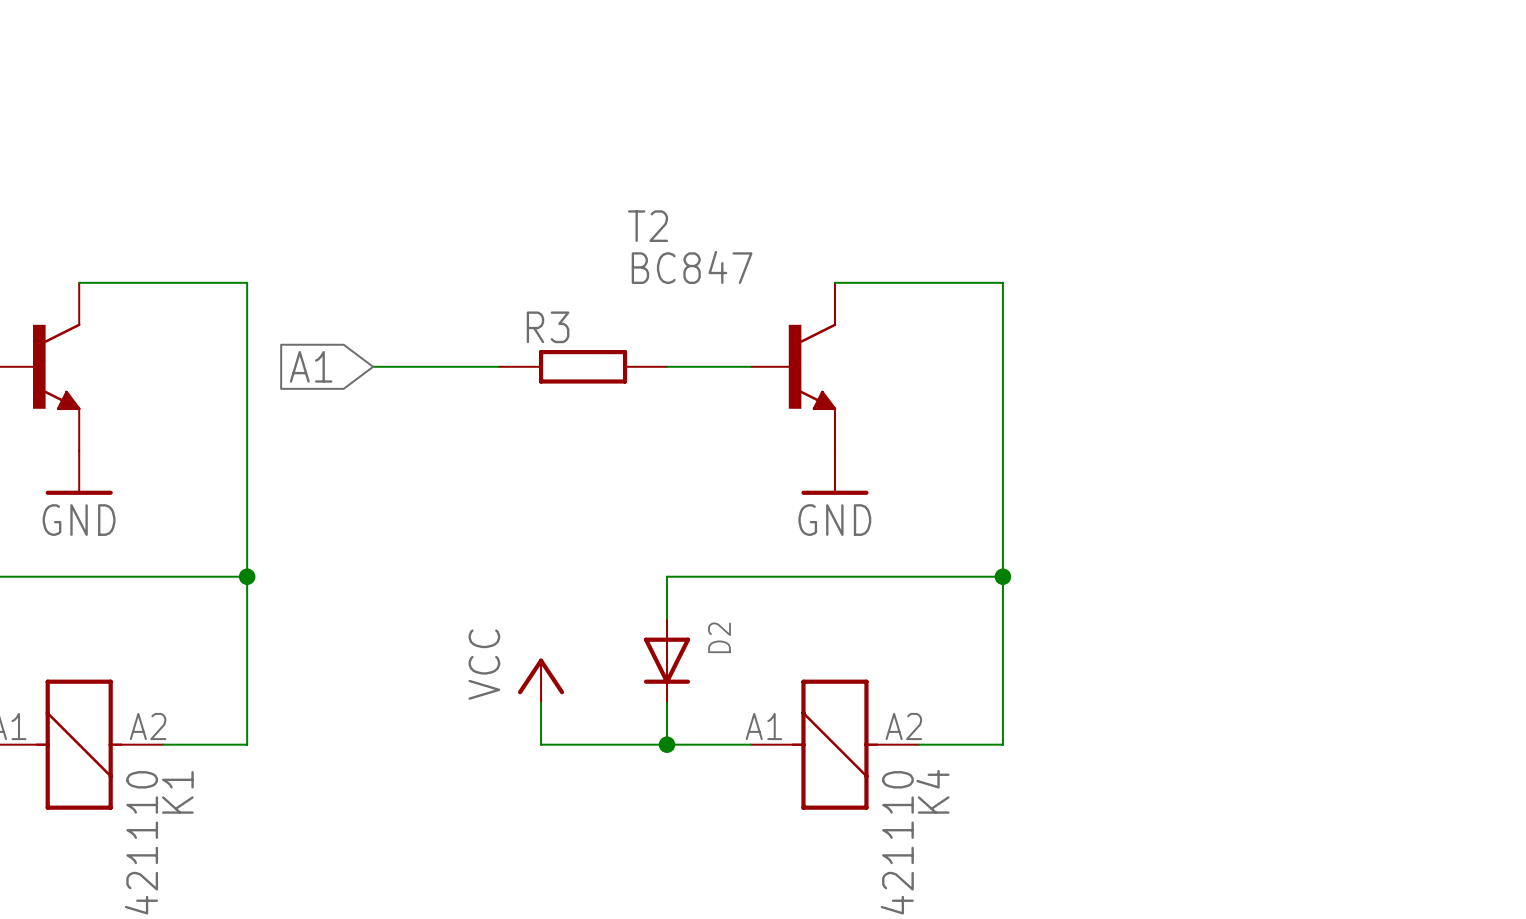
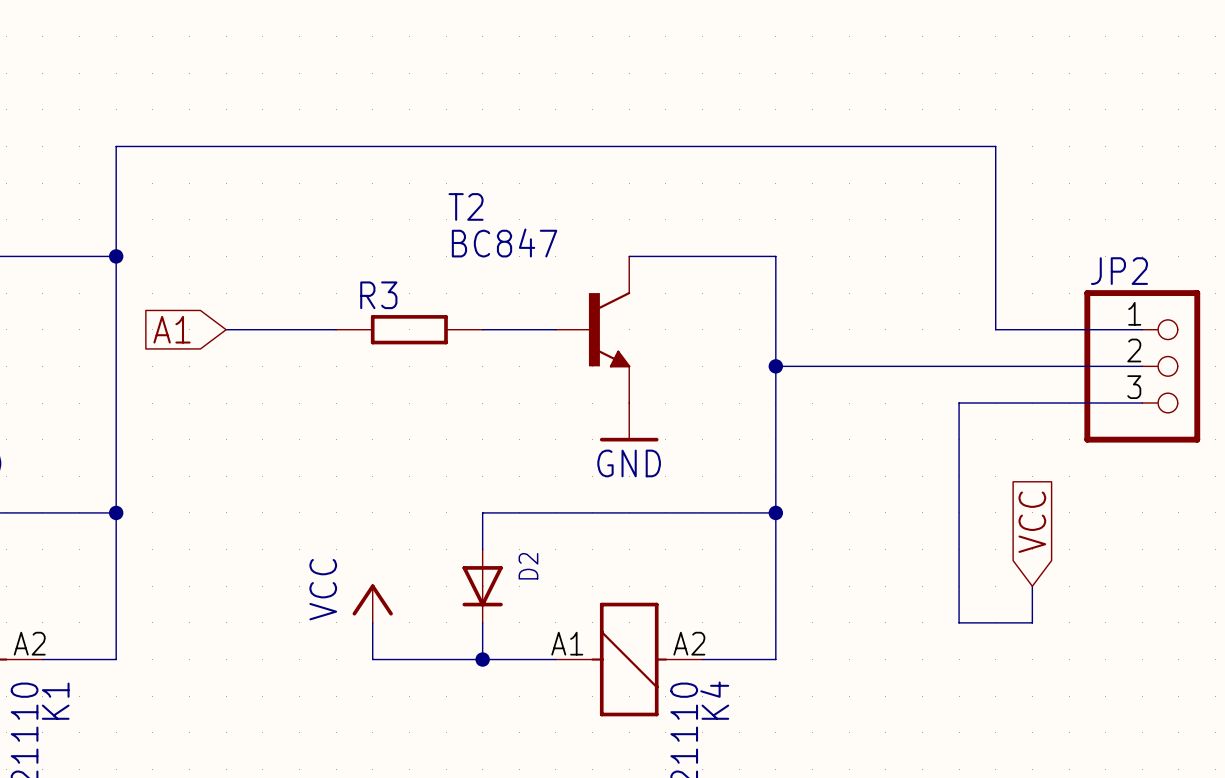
wire: none -> (116, 256) (116, 146) (995, 146) (995, 329) (1142, 329)
junction: none -> (116, 256)
wire: none -> (775, 366) (1142, 366)
junction: none -> (775, 366)
JP2: none -> (1142, 366)
wire: none -> (1142, 403) (959, 403) (959, 622) (1032, 622) (1032, 586)
global label: none -> VCC (1032, 522)

